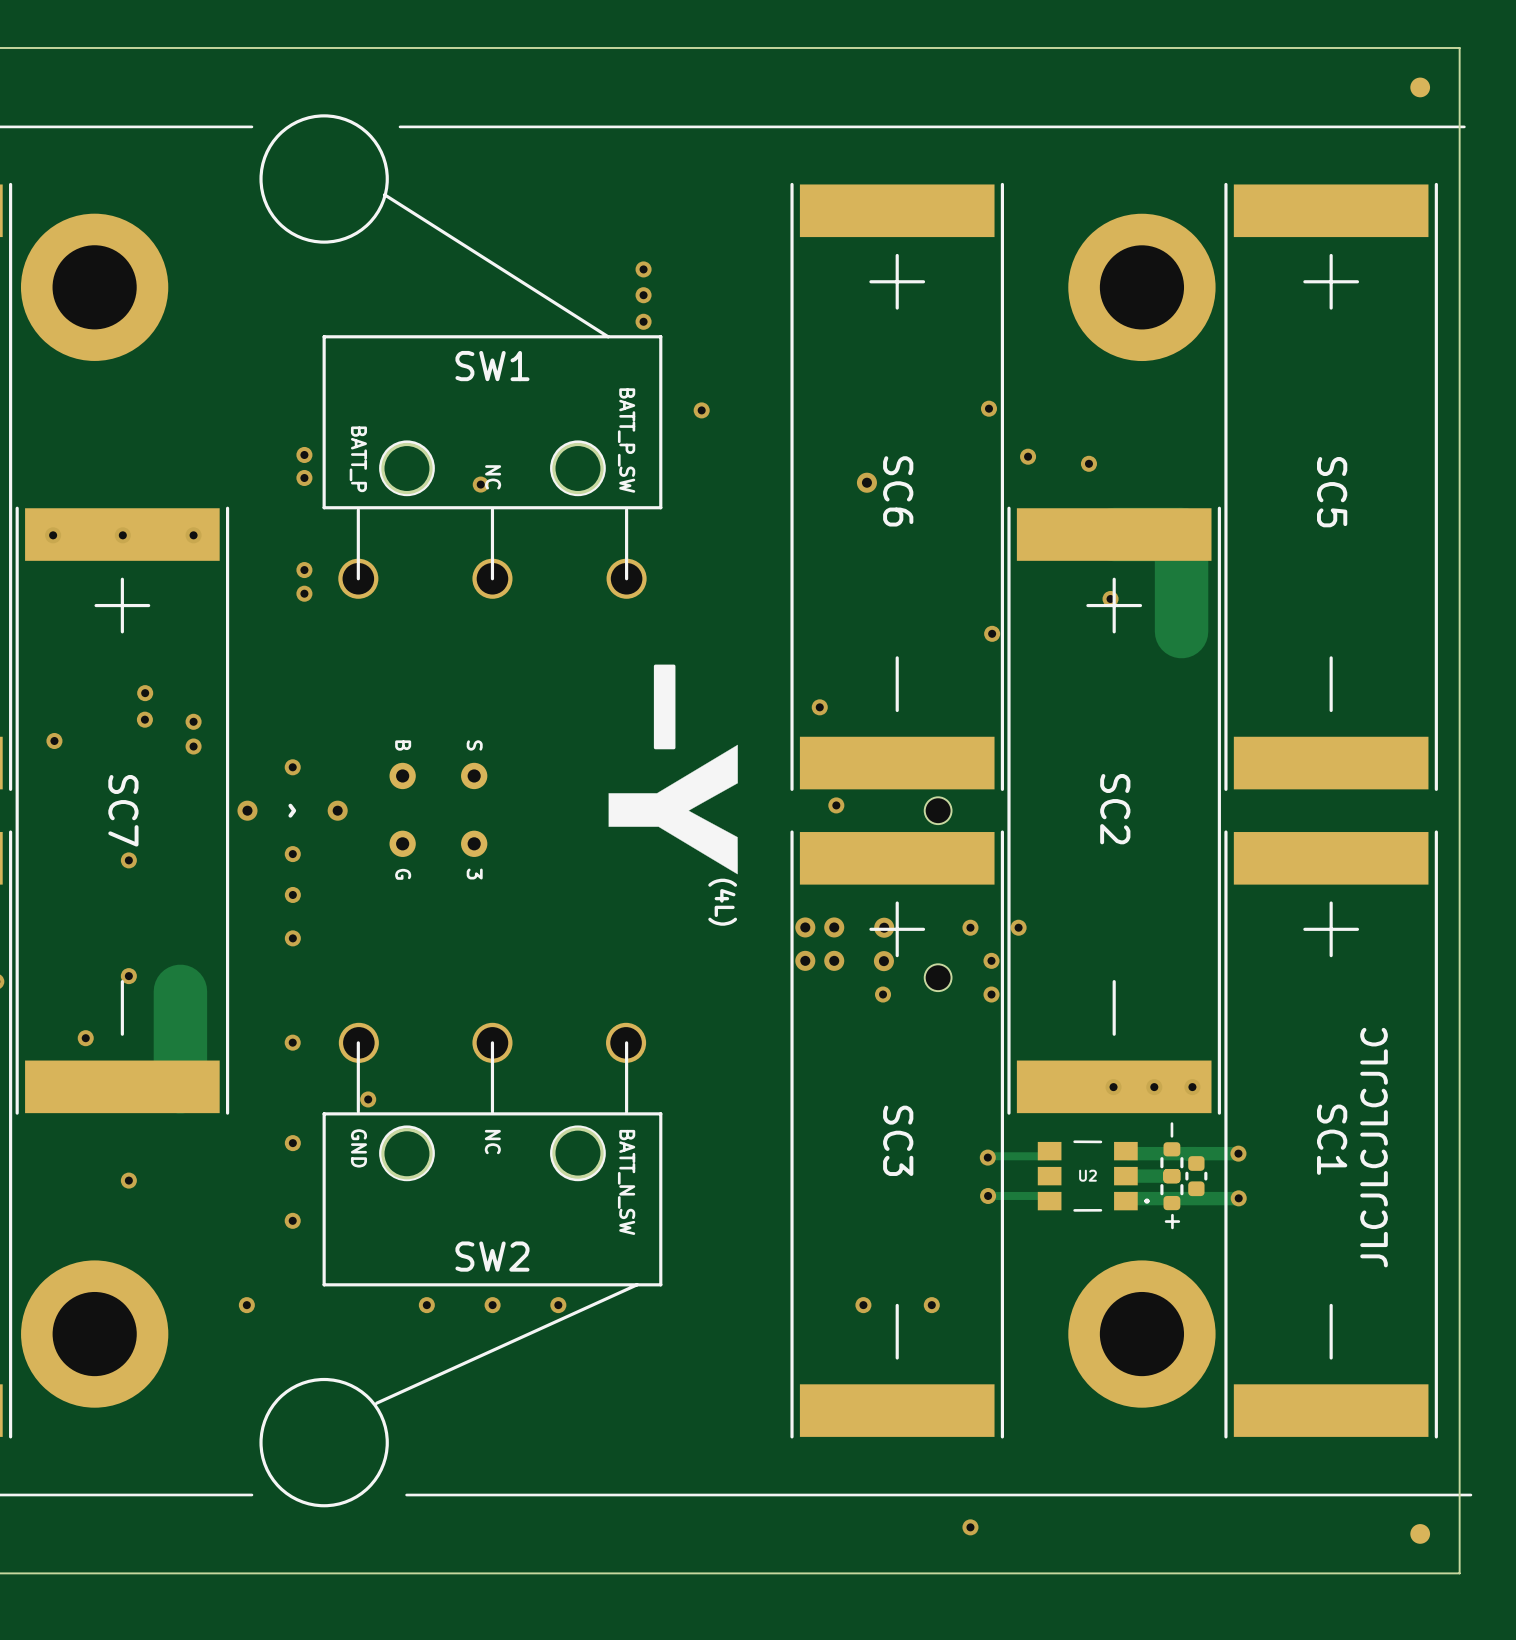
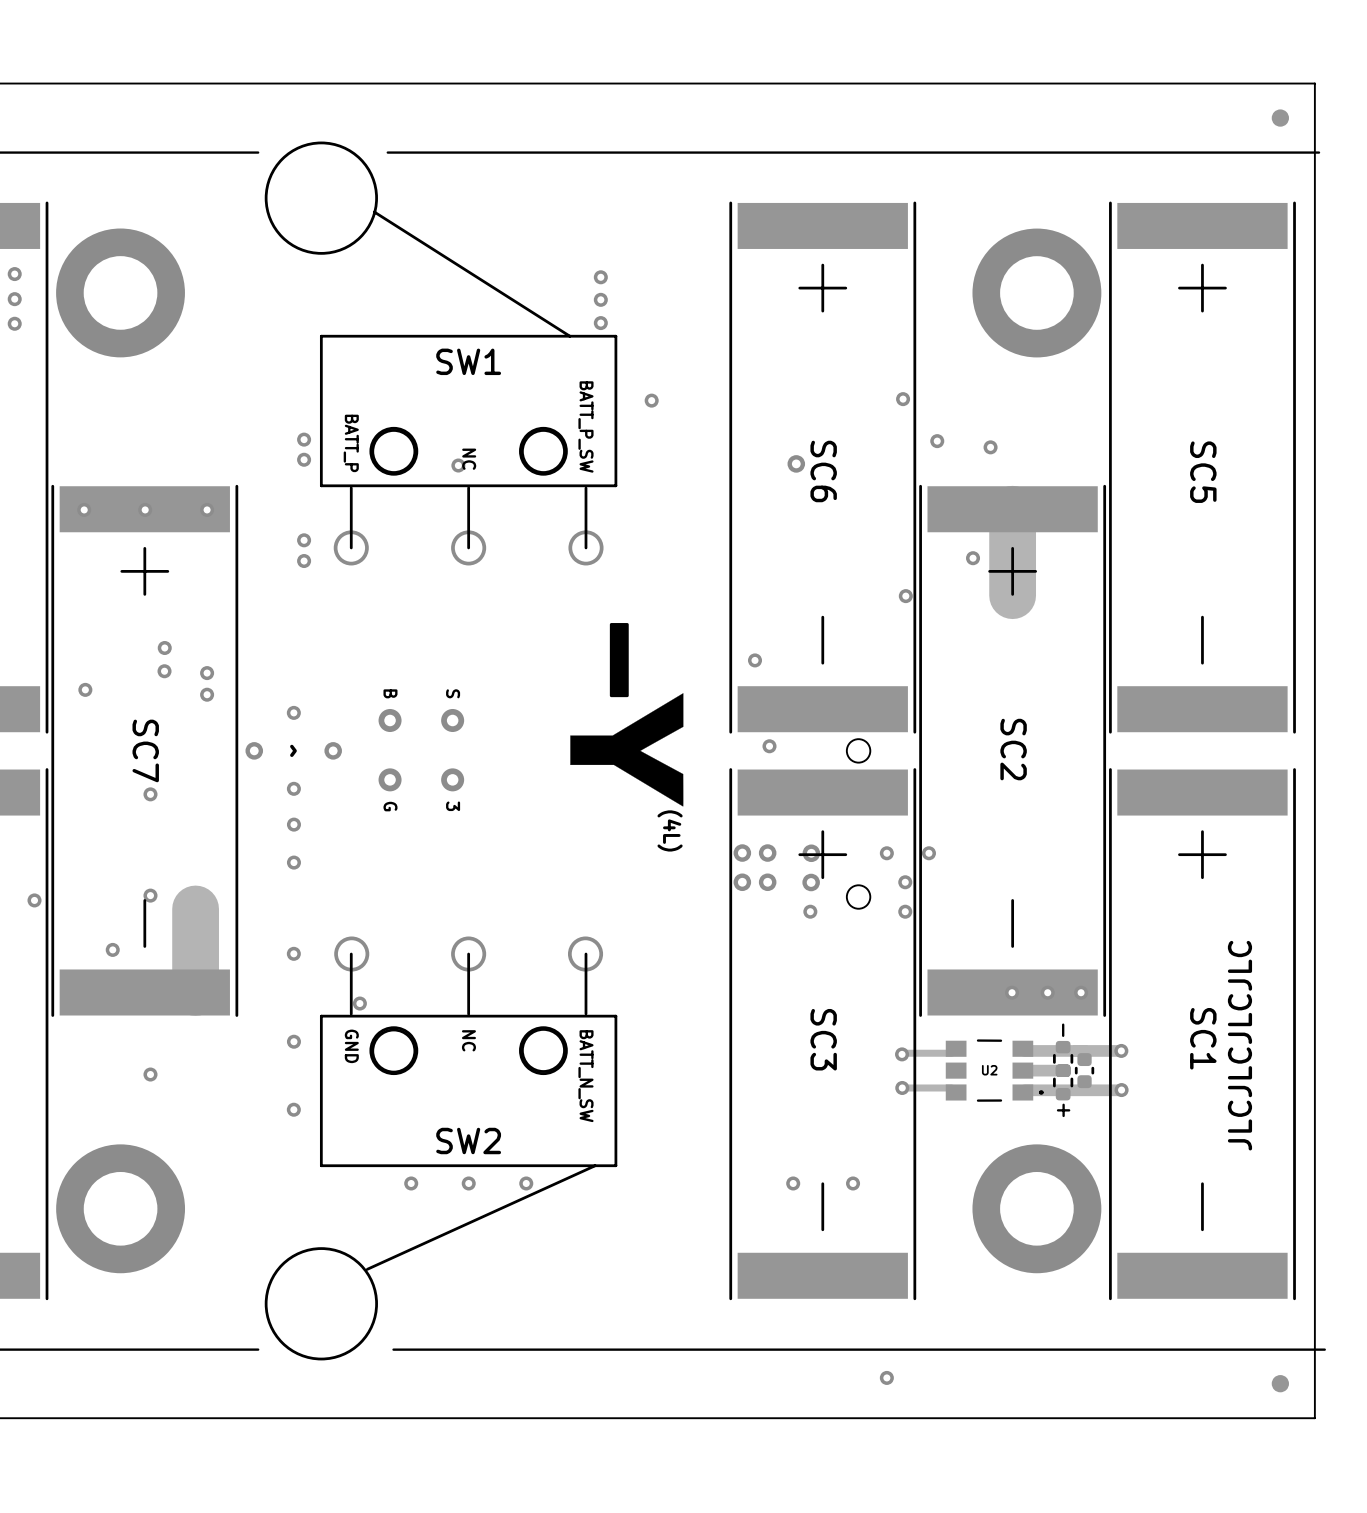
track: (1114, 534) (1181, 534) (1181, 631) -> (1012, 509) (1012, 595)
via position: (1110, 598) -> (973, 558)
via: (246, 1305) -> none

